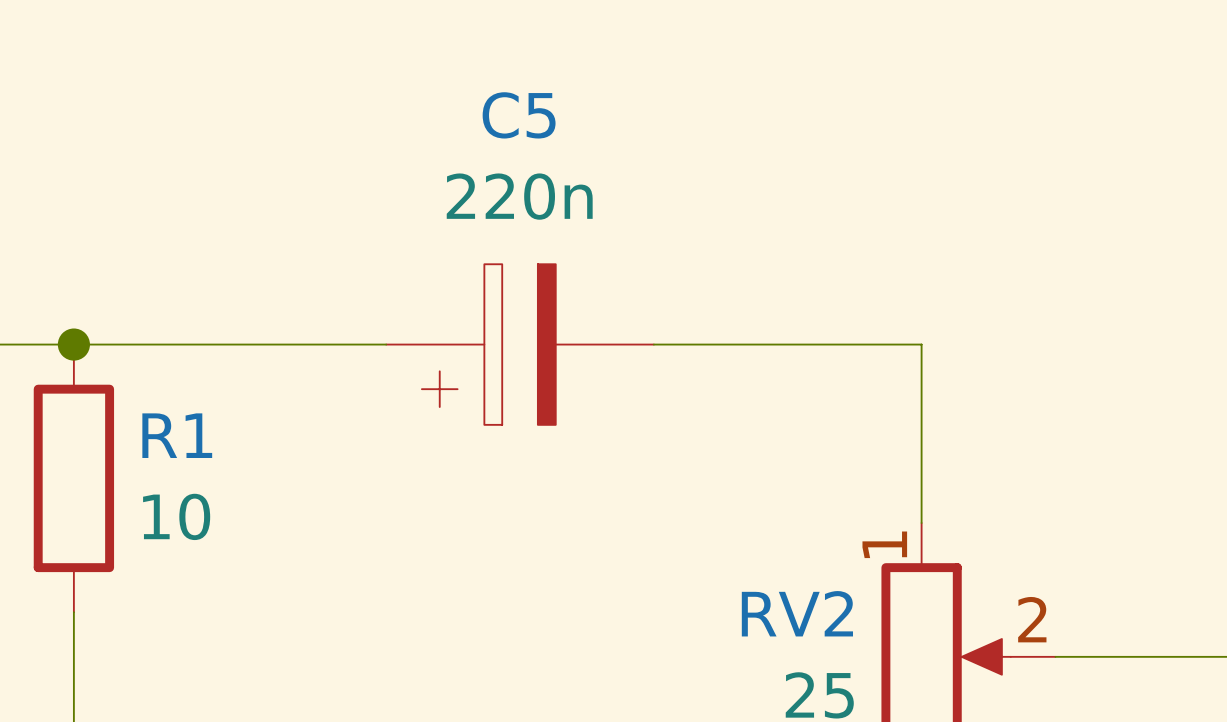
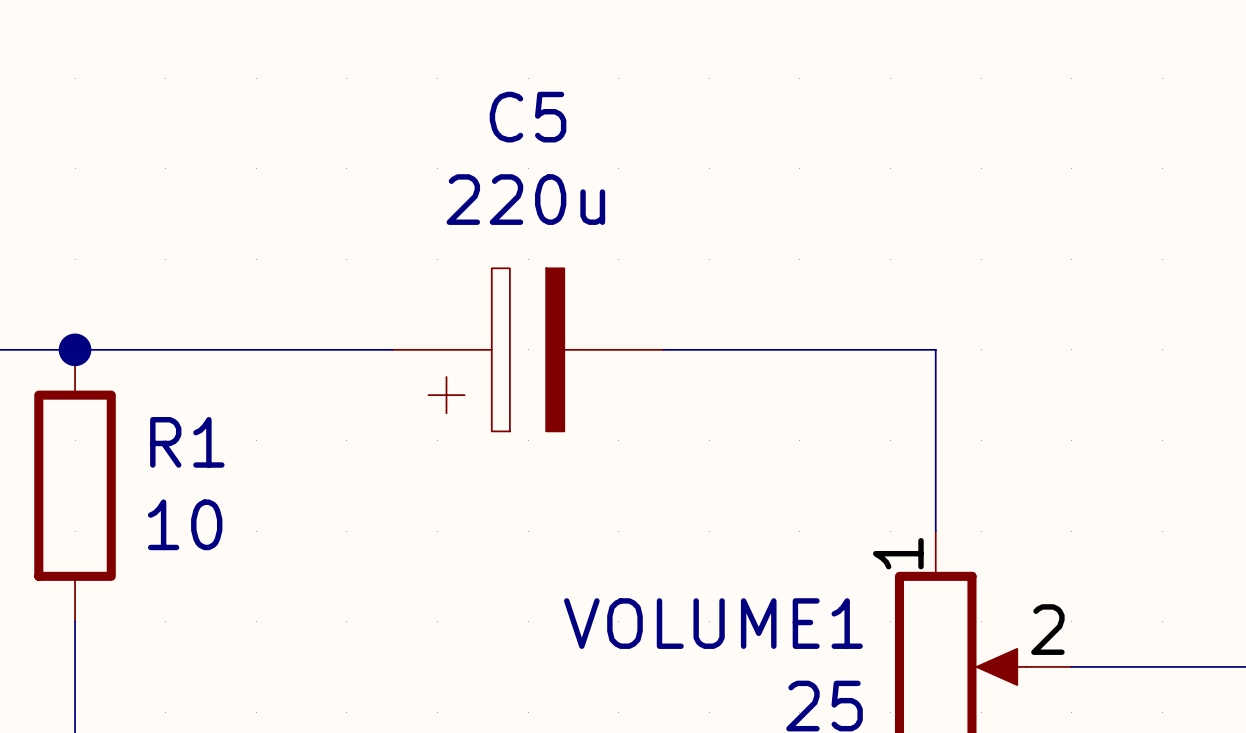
C5 value: 220n (519, 196) -> 220u (525, 199)
RV2 name: RV2 (797, 613) -> VOLUME1 (713, 623)

